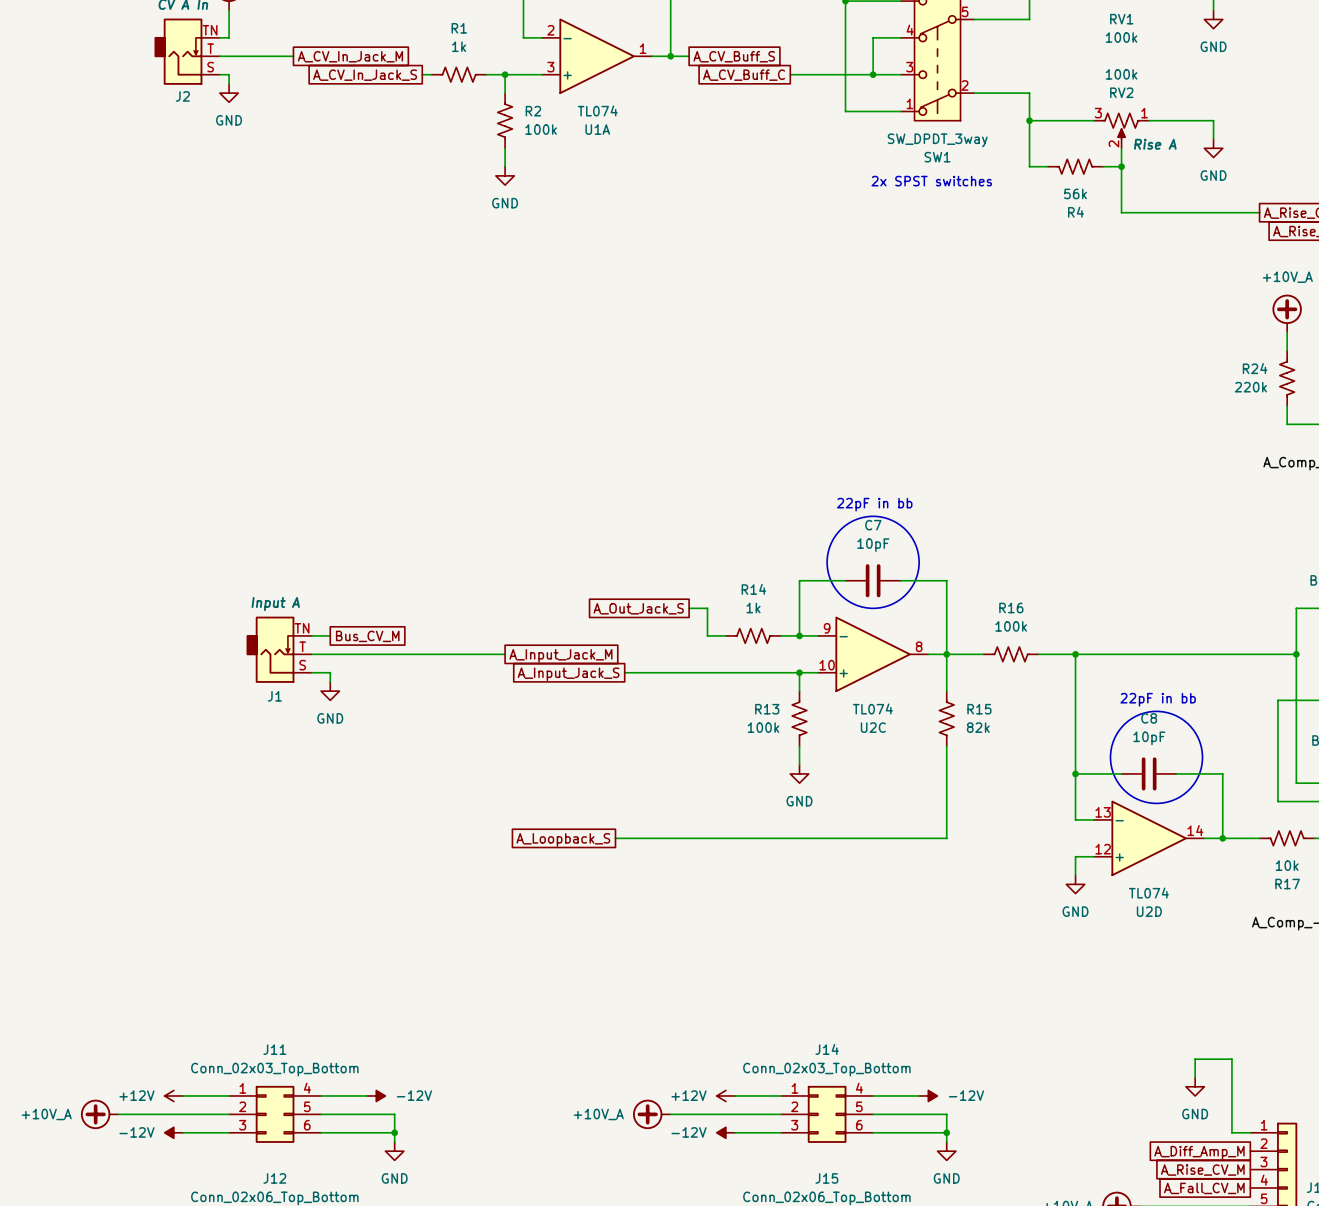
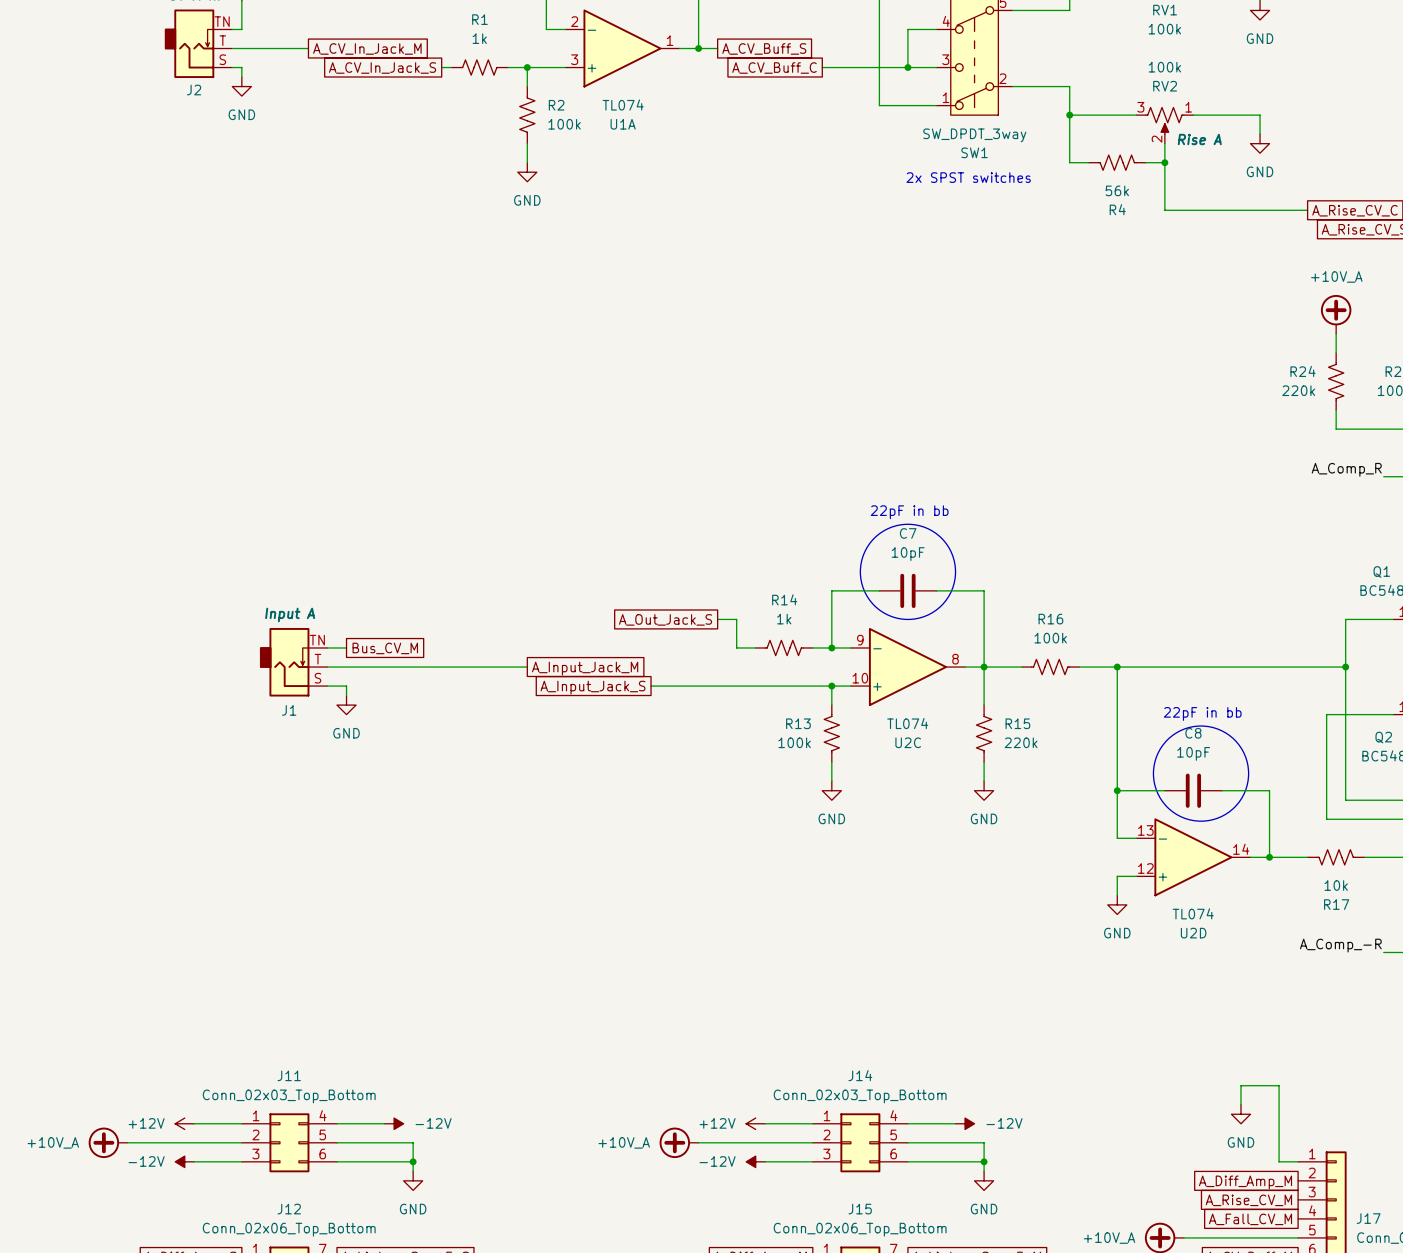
R15 value: 82k (978, 727) -> 220k (1021, 742)
wire: (946, 764) (946, 838) (615, 838) -> none
power symbol: none -> GND (984, 790)
global label: A_Loopback_S (563, 839) -> none

